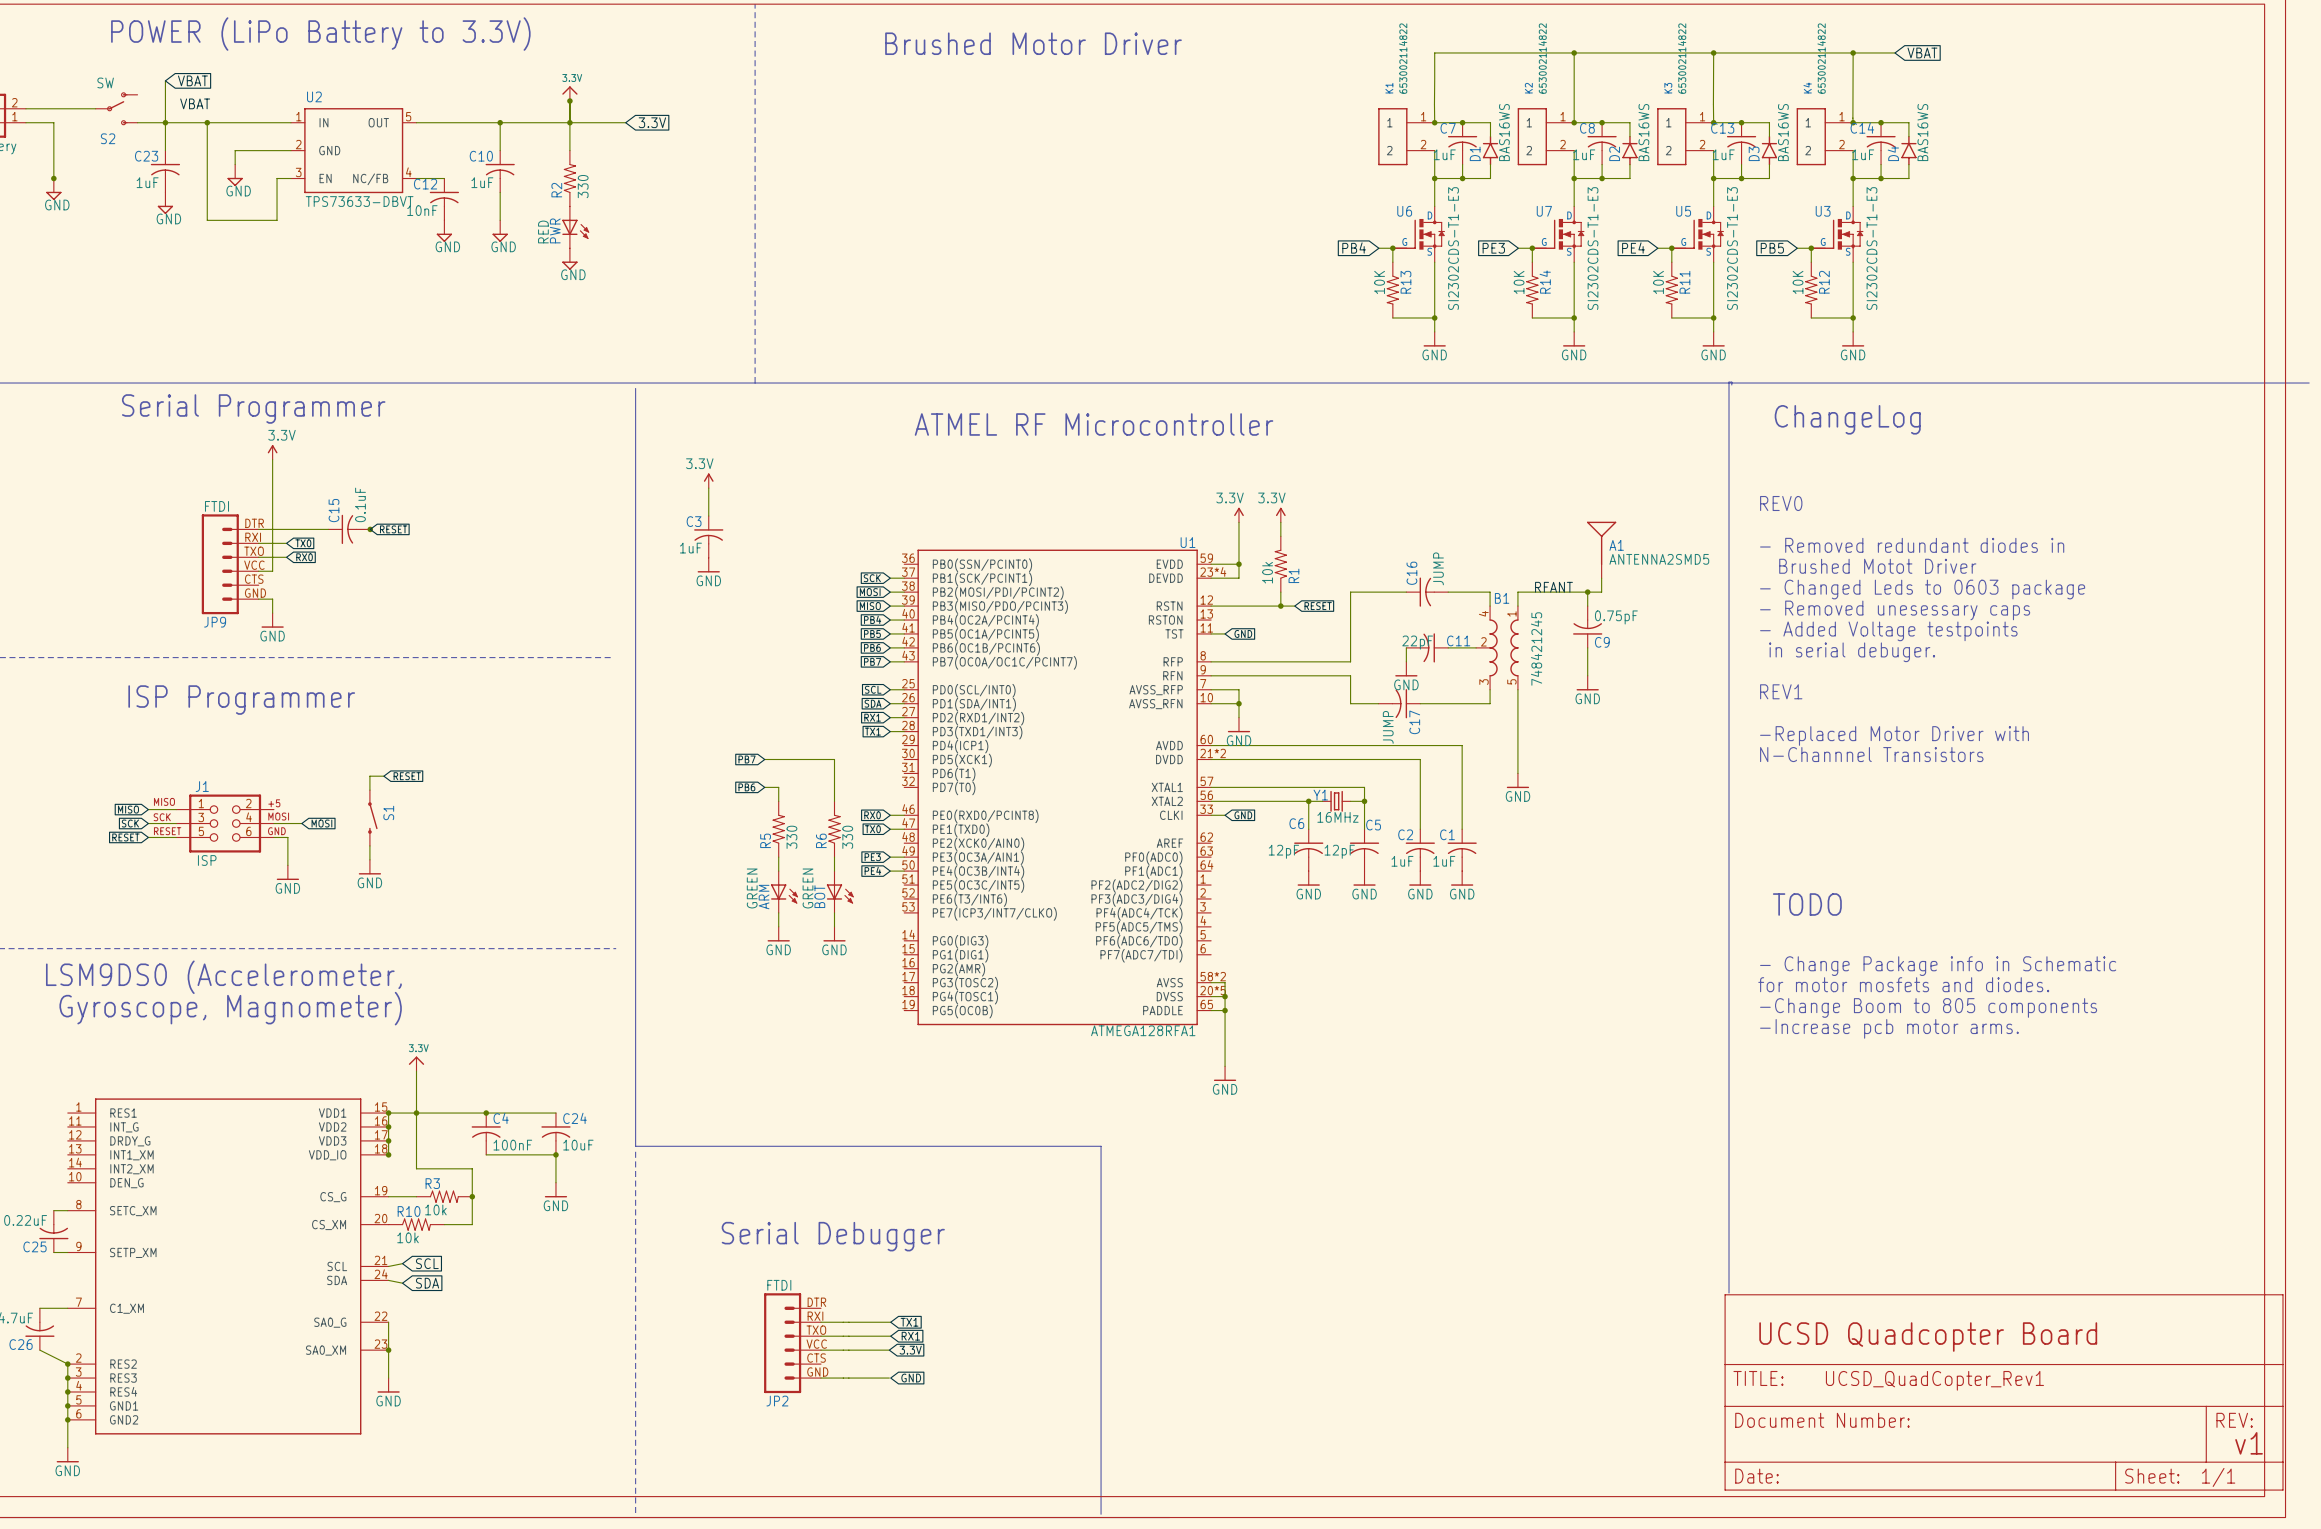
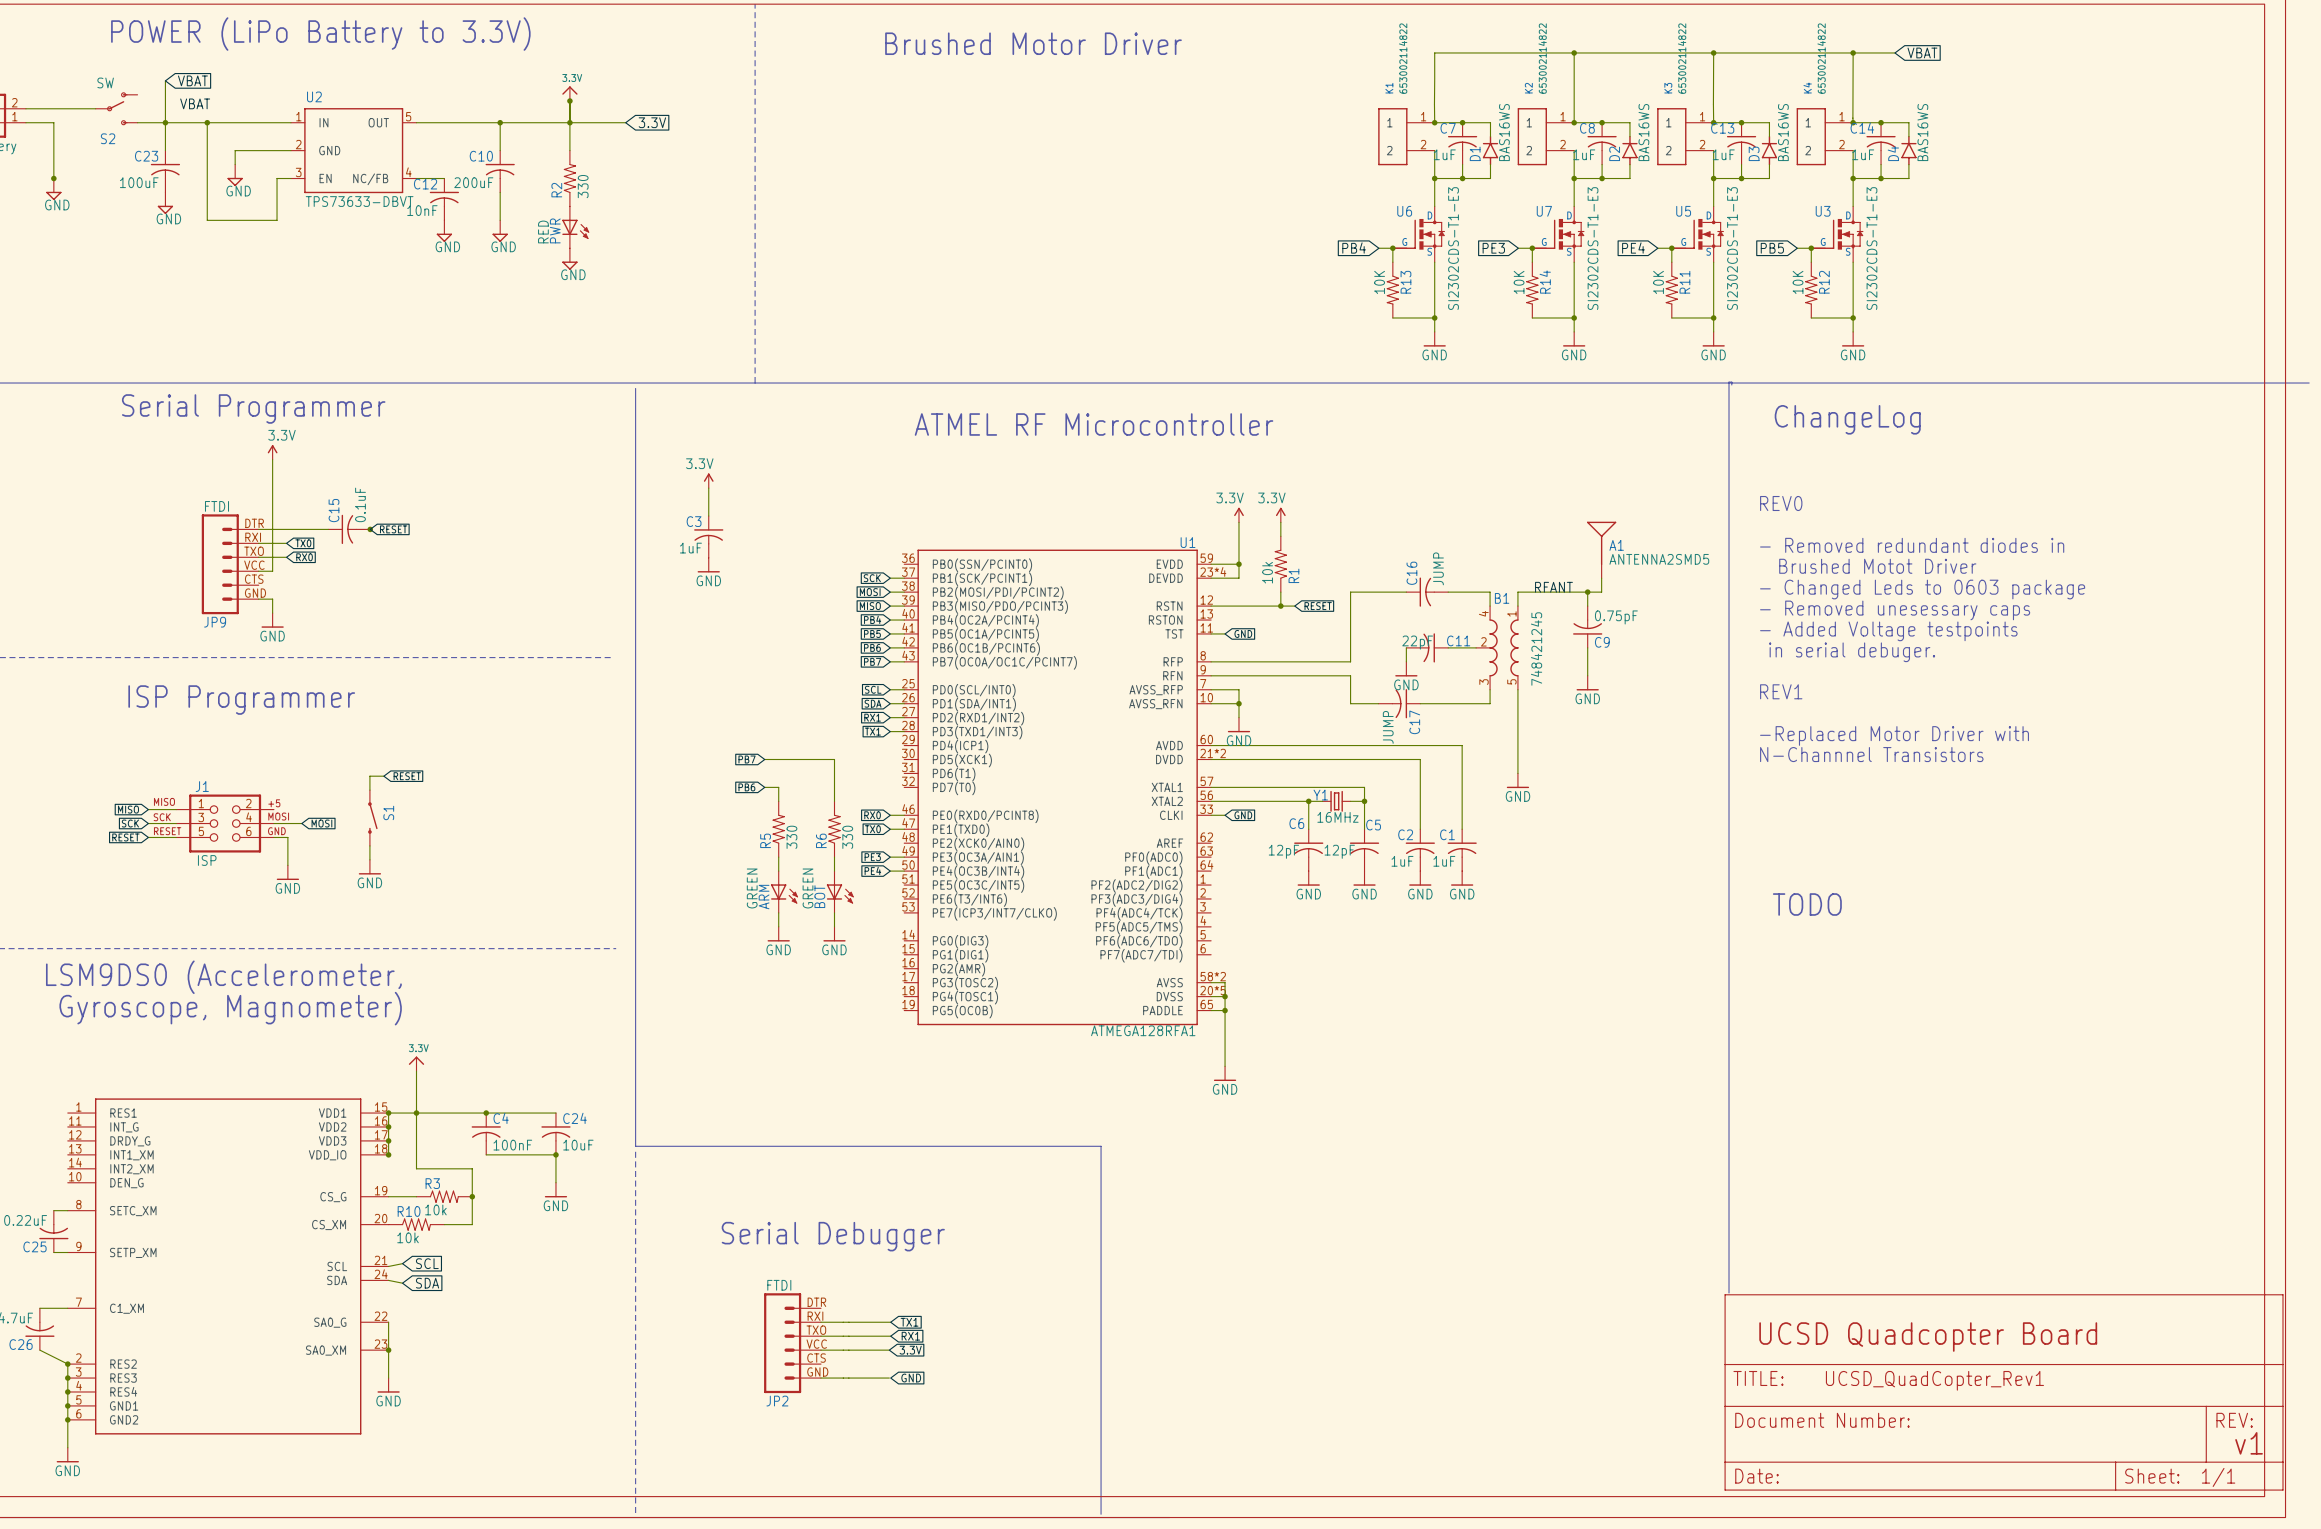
C23 value: 1uF (147, 182) -> 100uF (139, 182)
C10 value: 1uF (482, 182) -> 200uF (473, 182)
text: - Change Package info in Schematic (1938, 966) -> none
text: for motor mosfets and diodes. (1903, 984) -> none
text: -Change Boom to 805 components (1928, 1007) -> none
text: -Increase pcb motor arms. (1889, 1028) -> none

